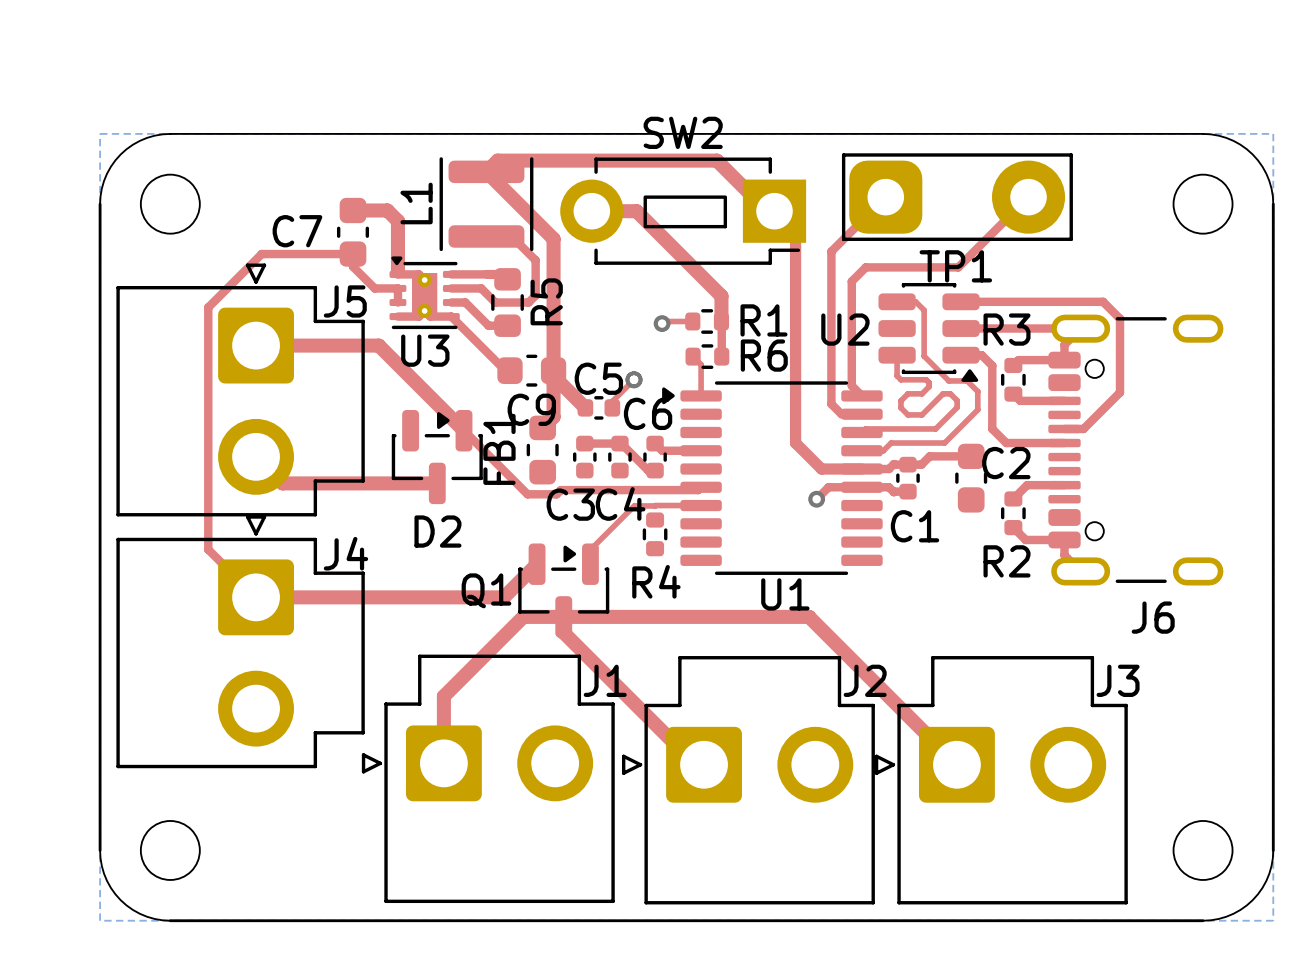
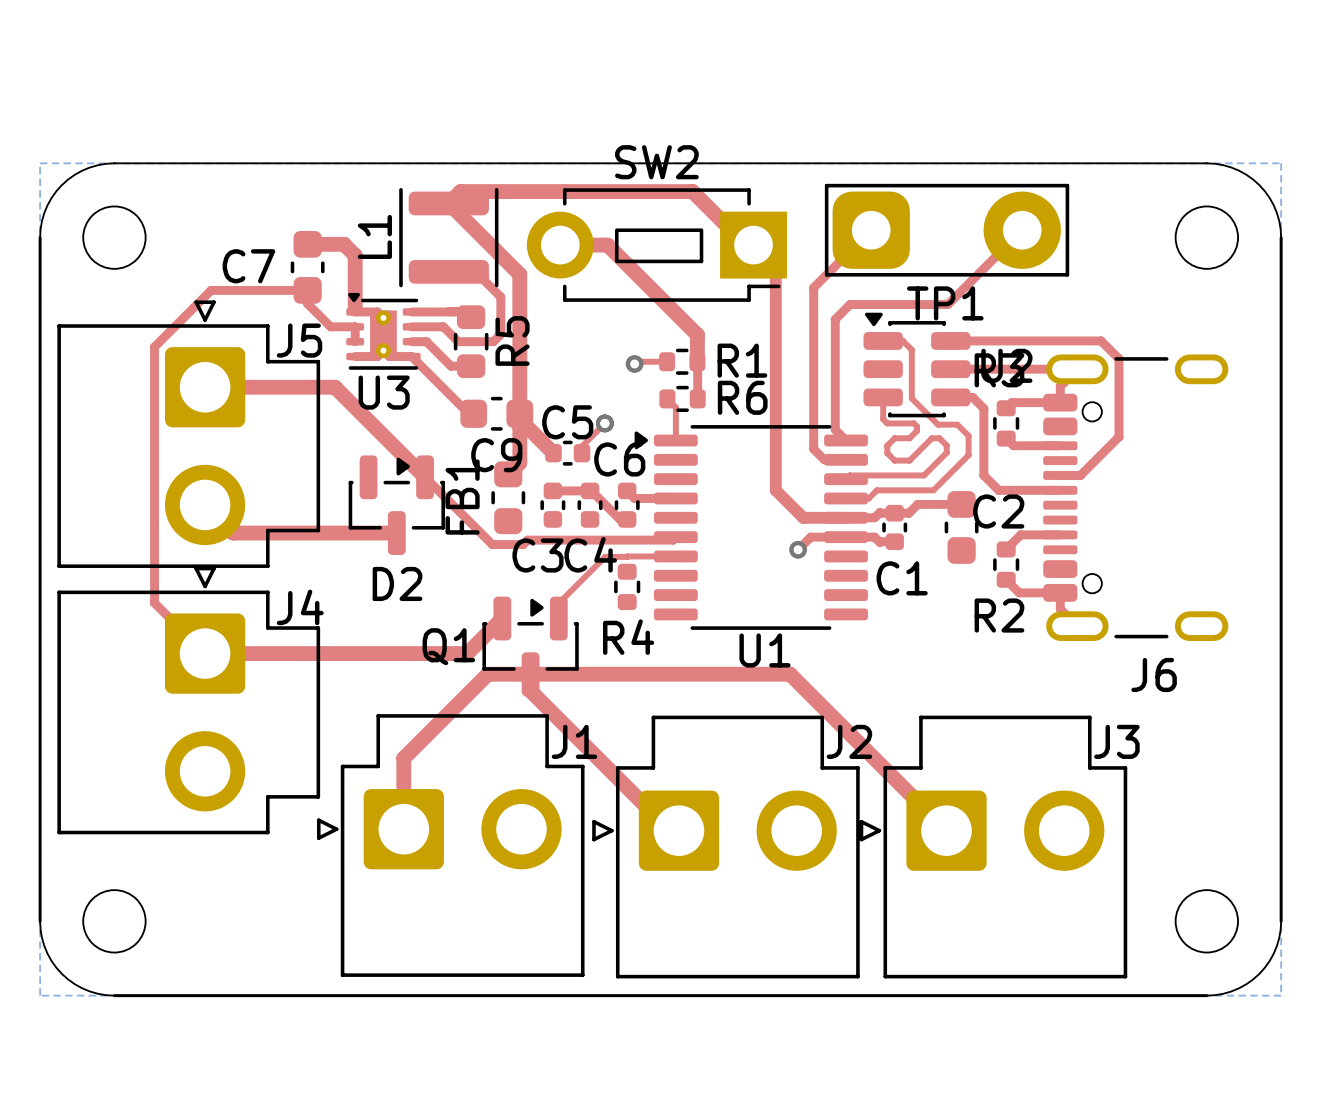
U2 rotation: 0° (929, 332) -> 180° (917, 365)

